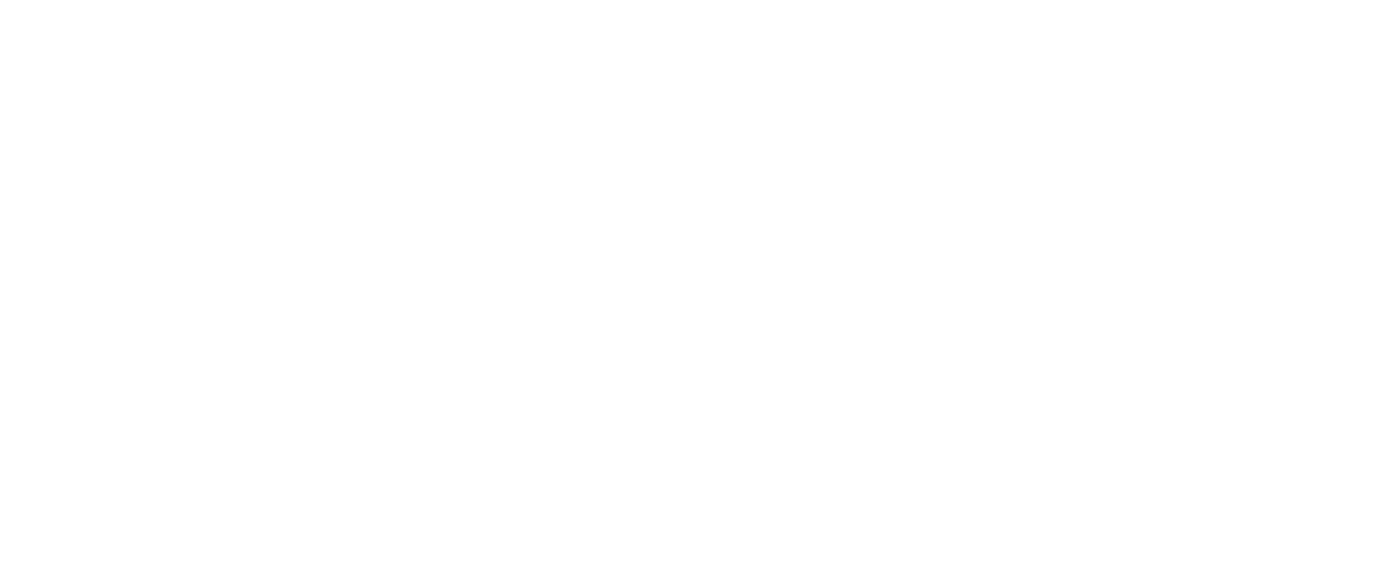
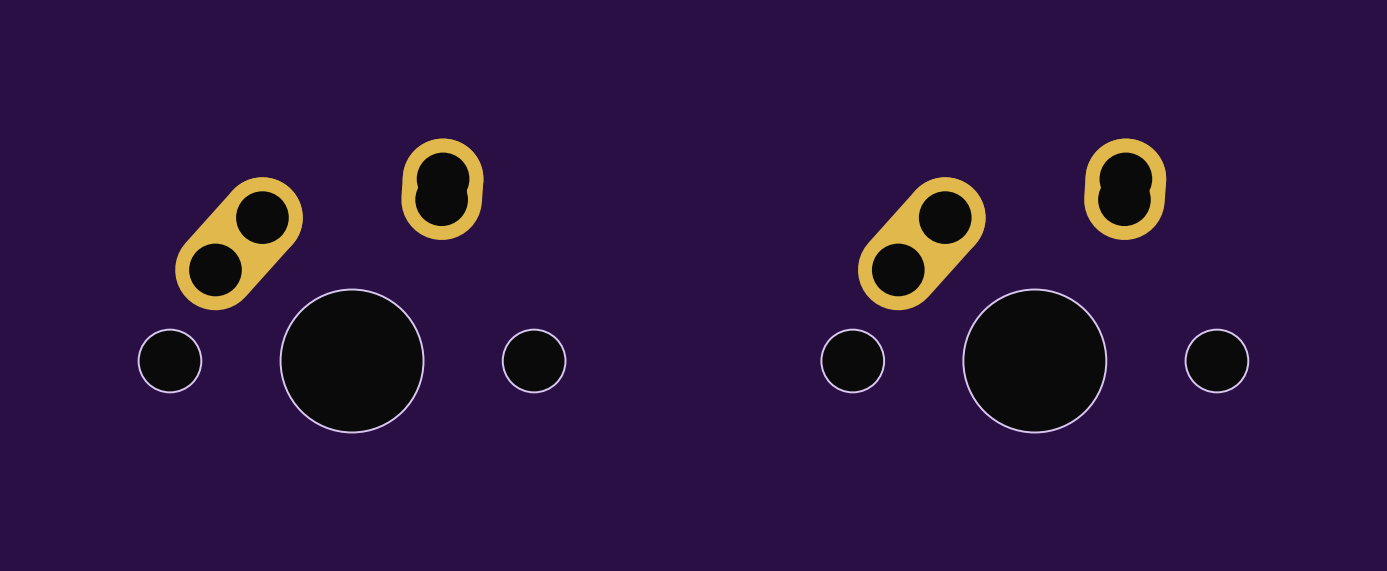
part: none -> (352, 285)
part: none -> (1034, 285)

